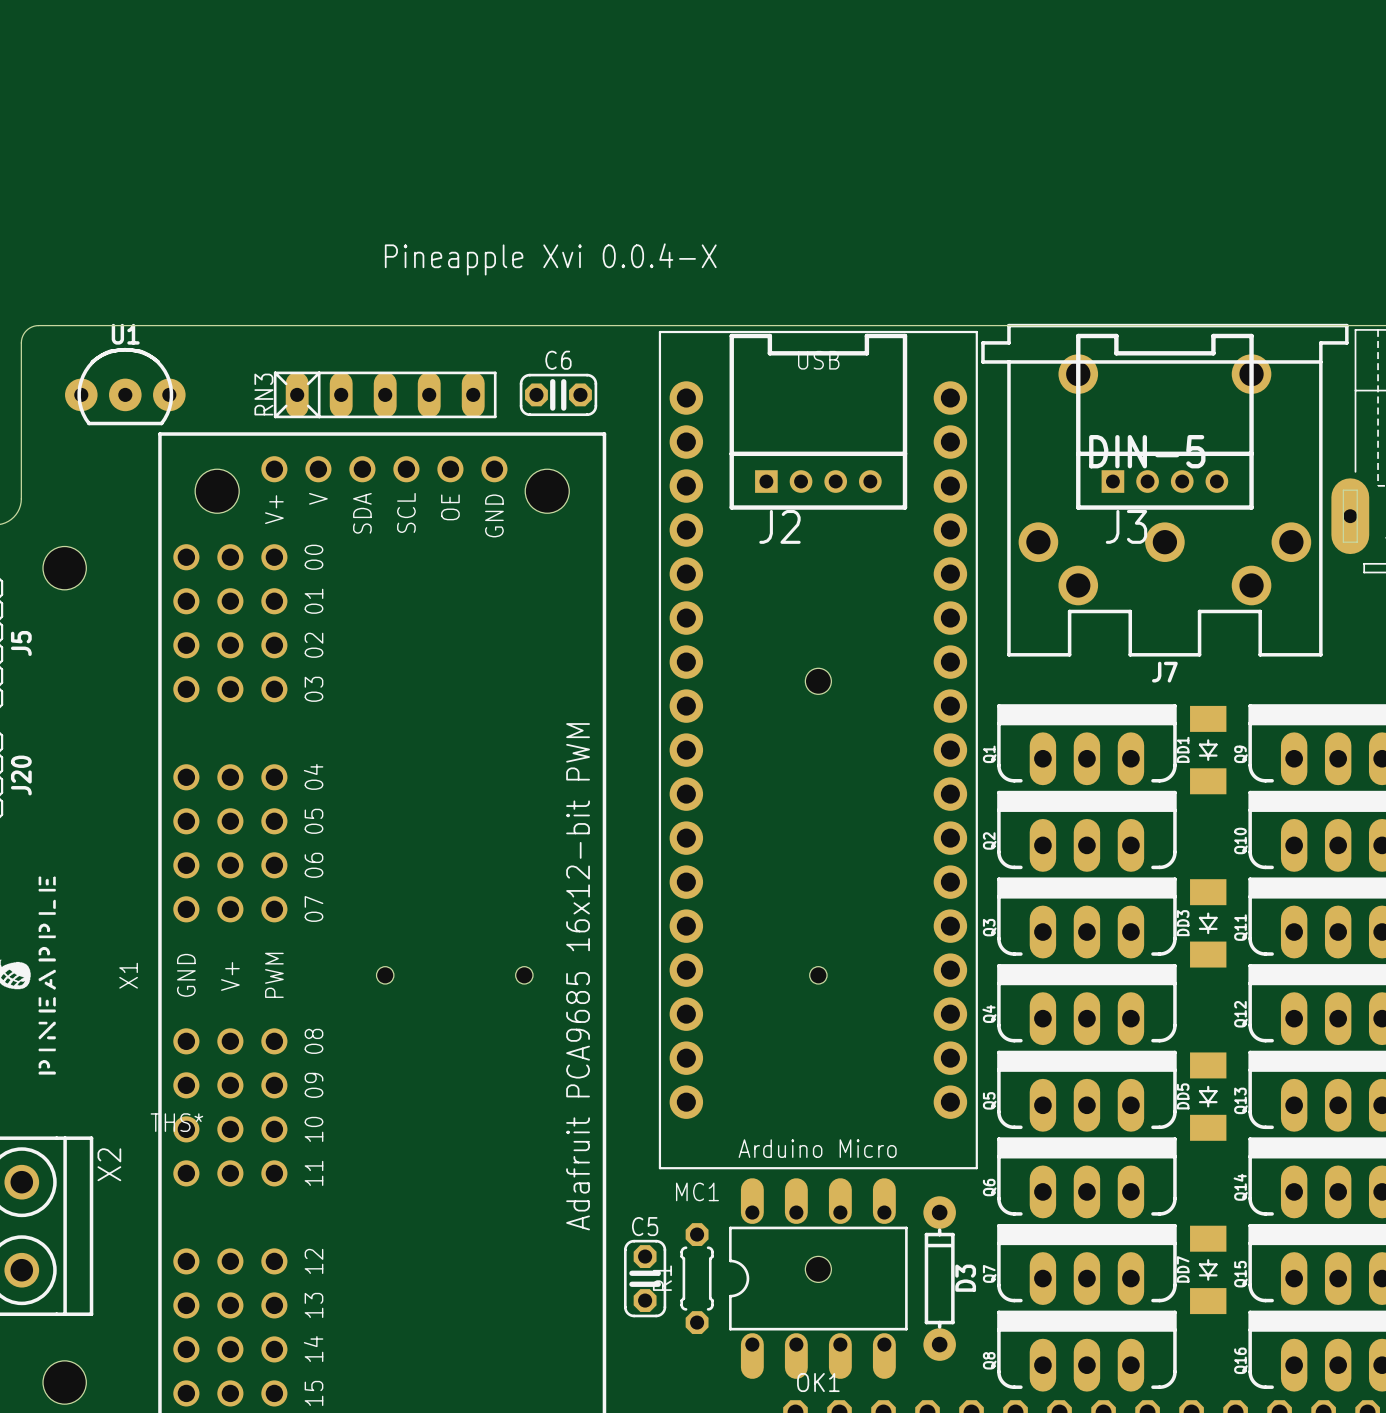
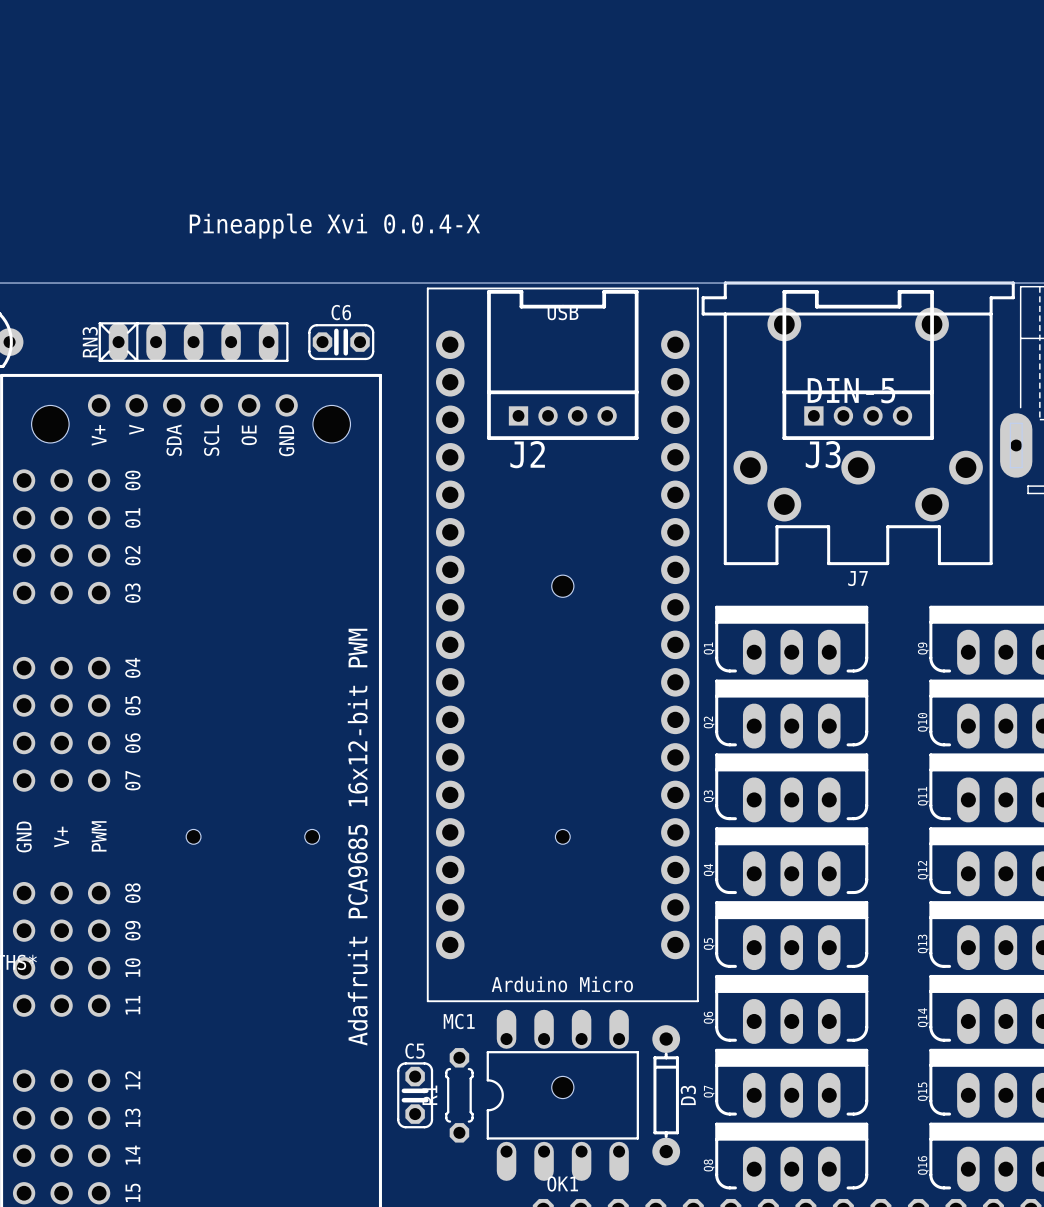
DD1: (1208, 750) -> none
DD3: (1208, 923) -> none
DD5: (1208, 1096) -> none
DD7: (1208, 1269) -> none

